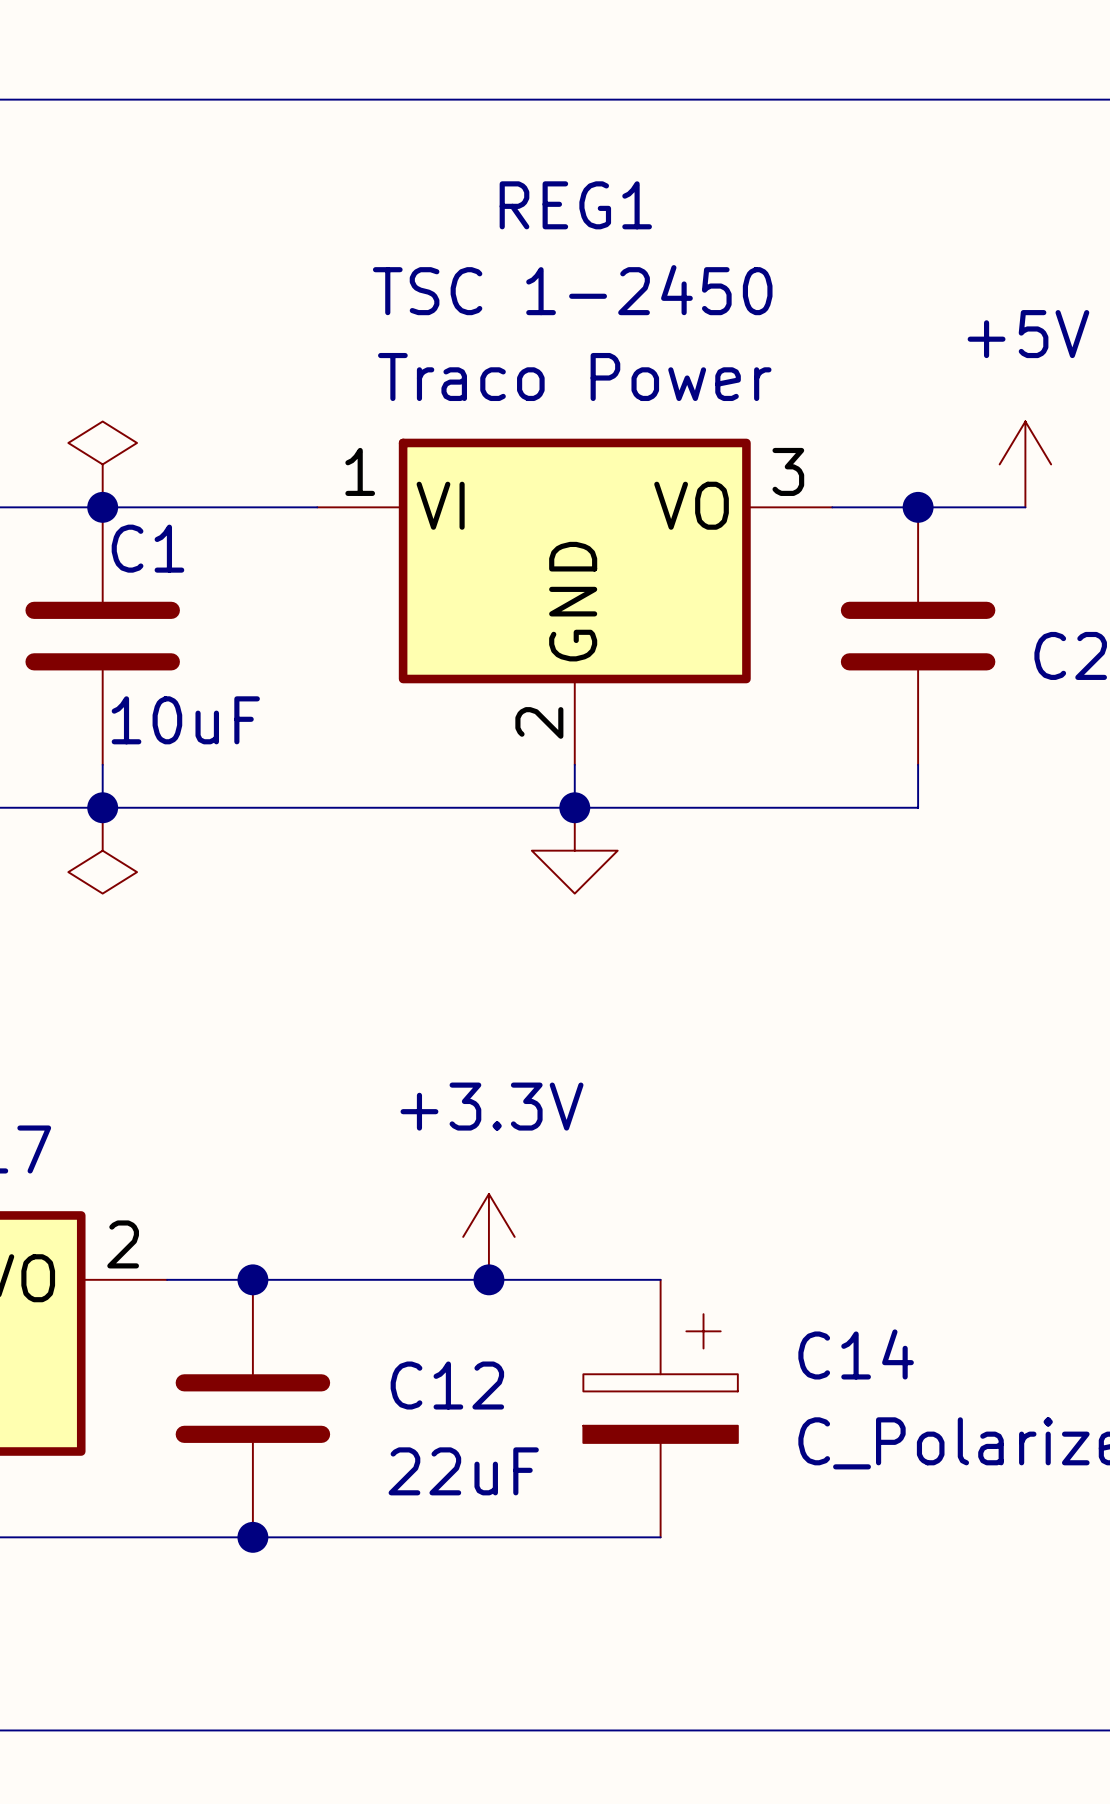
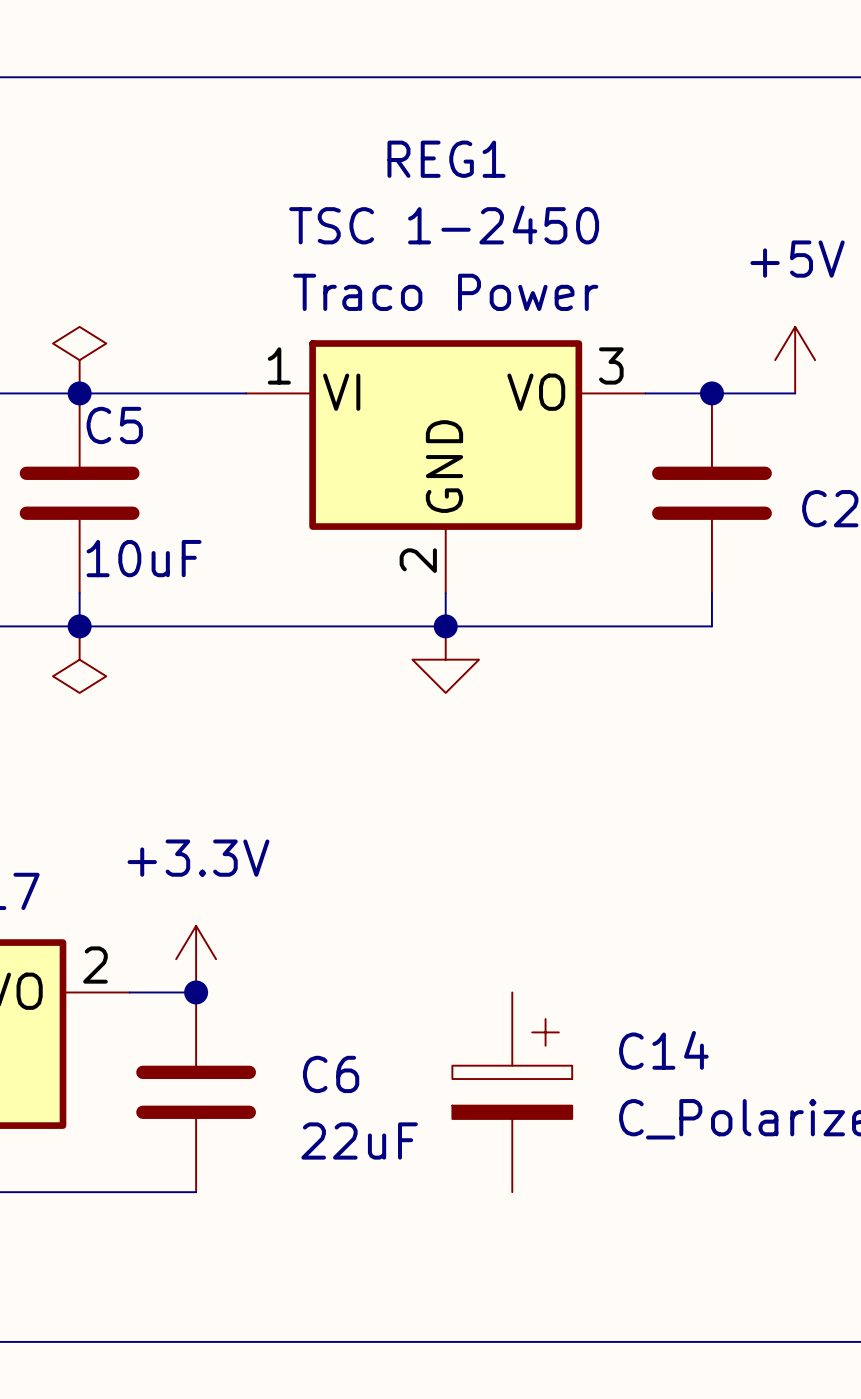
C1 name: C1 (147, 548) -> C5 (114, 425)
power symbol position: +3.3V (488, 1236) -> +3.3V (196, 959)
wire: (252, 1279) (660, 1279) -> none
junction: (488, 1279) -> none
C12 name: C12 (447, 1385) -> C6 (331, 1074)
wire: (252, 1537) (660, 1537) -> none
junction: (252, 1537) -> none

